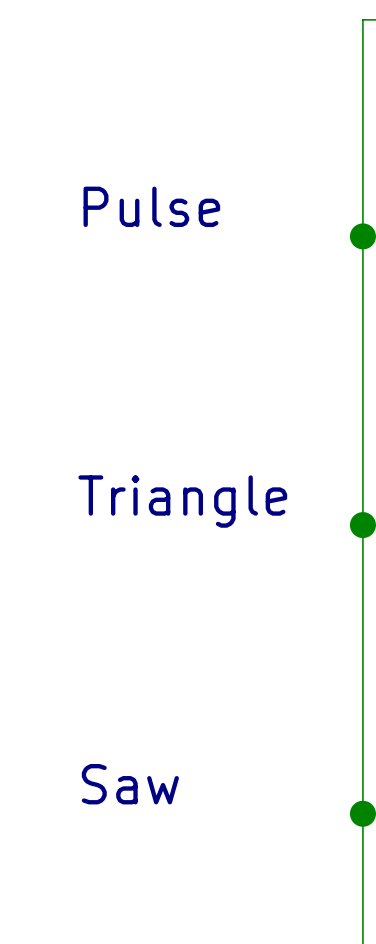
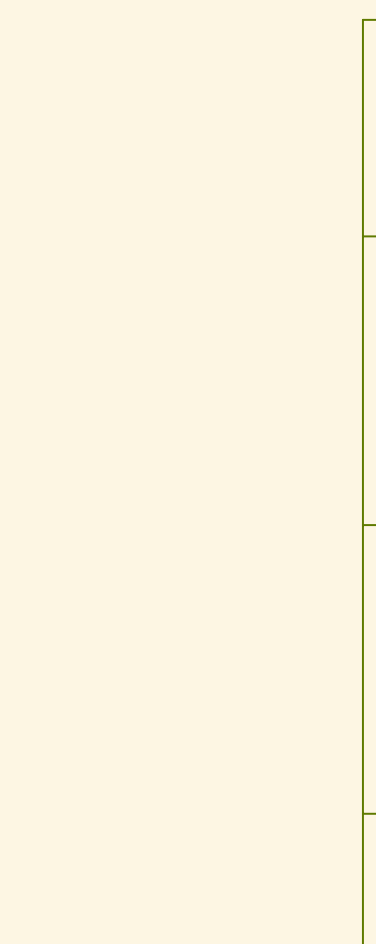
text: Pulse (151, 206) -> none
junction: (362, 236) -> none
text: Triangle (182, 501) -> none
junction: (362, 525) -> none
text: Saw (130, 784) -> none
junction: (362, 813) -> none

